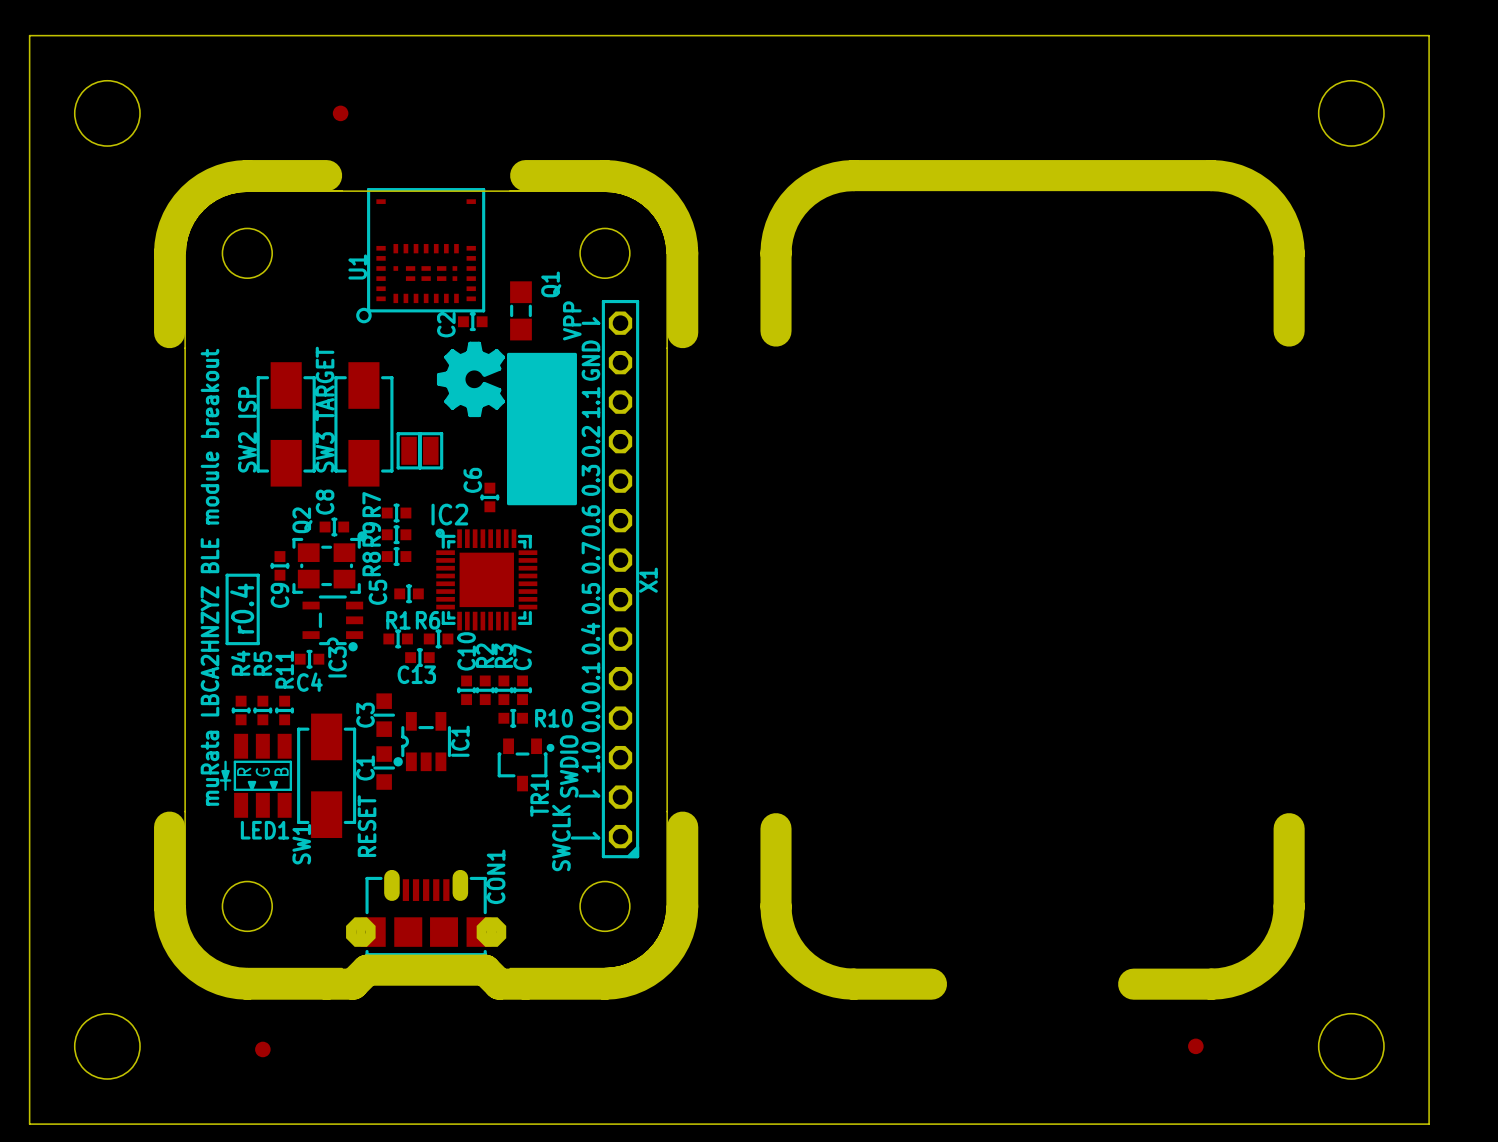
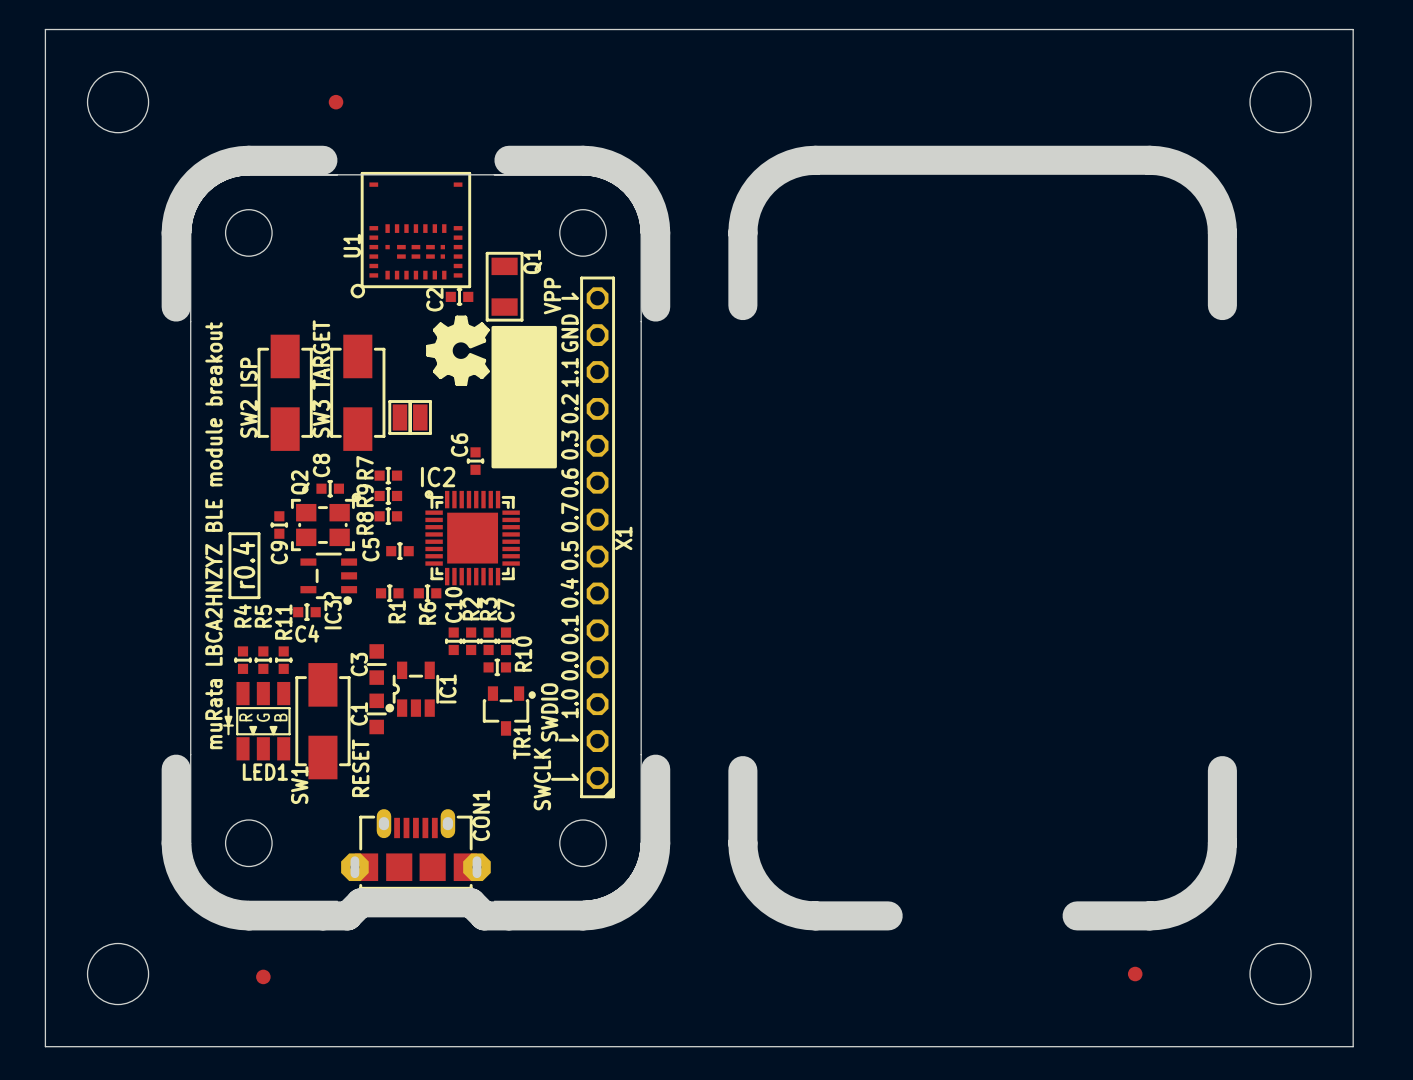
Q1 footprint: [510, 281, 532, 341] -> [485, 251, 524, 322]
R1 name rotation: 0° (398, 620) -> 90° counterclockwise (397, 611)
R1 name position: R1 (398, 620) -> R1 (397, 611)
R6 name rotation: 0° (428, 620) -> 90° counterclockwise (427, 613)
R6 name position: R6 (428, 620) -> R6 (427, 613)
C13: (419, 657) -> none
R10 name rotation: 0° (553, 718) -> 90° counterclockwise (523, 654)

